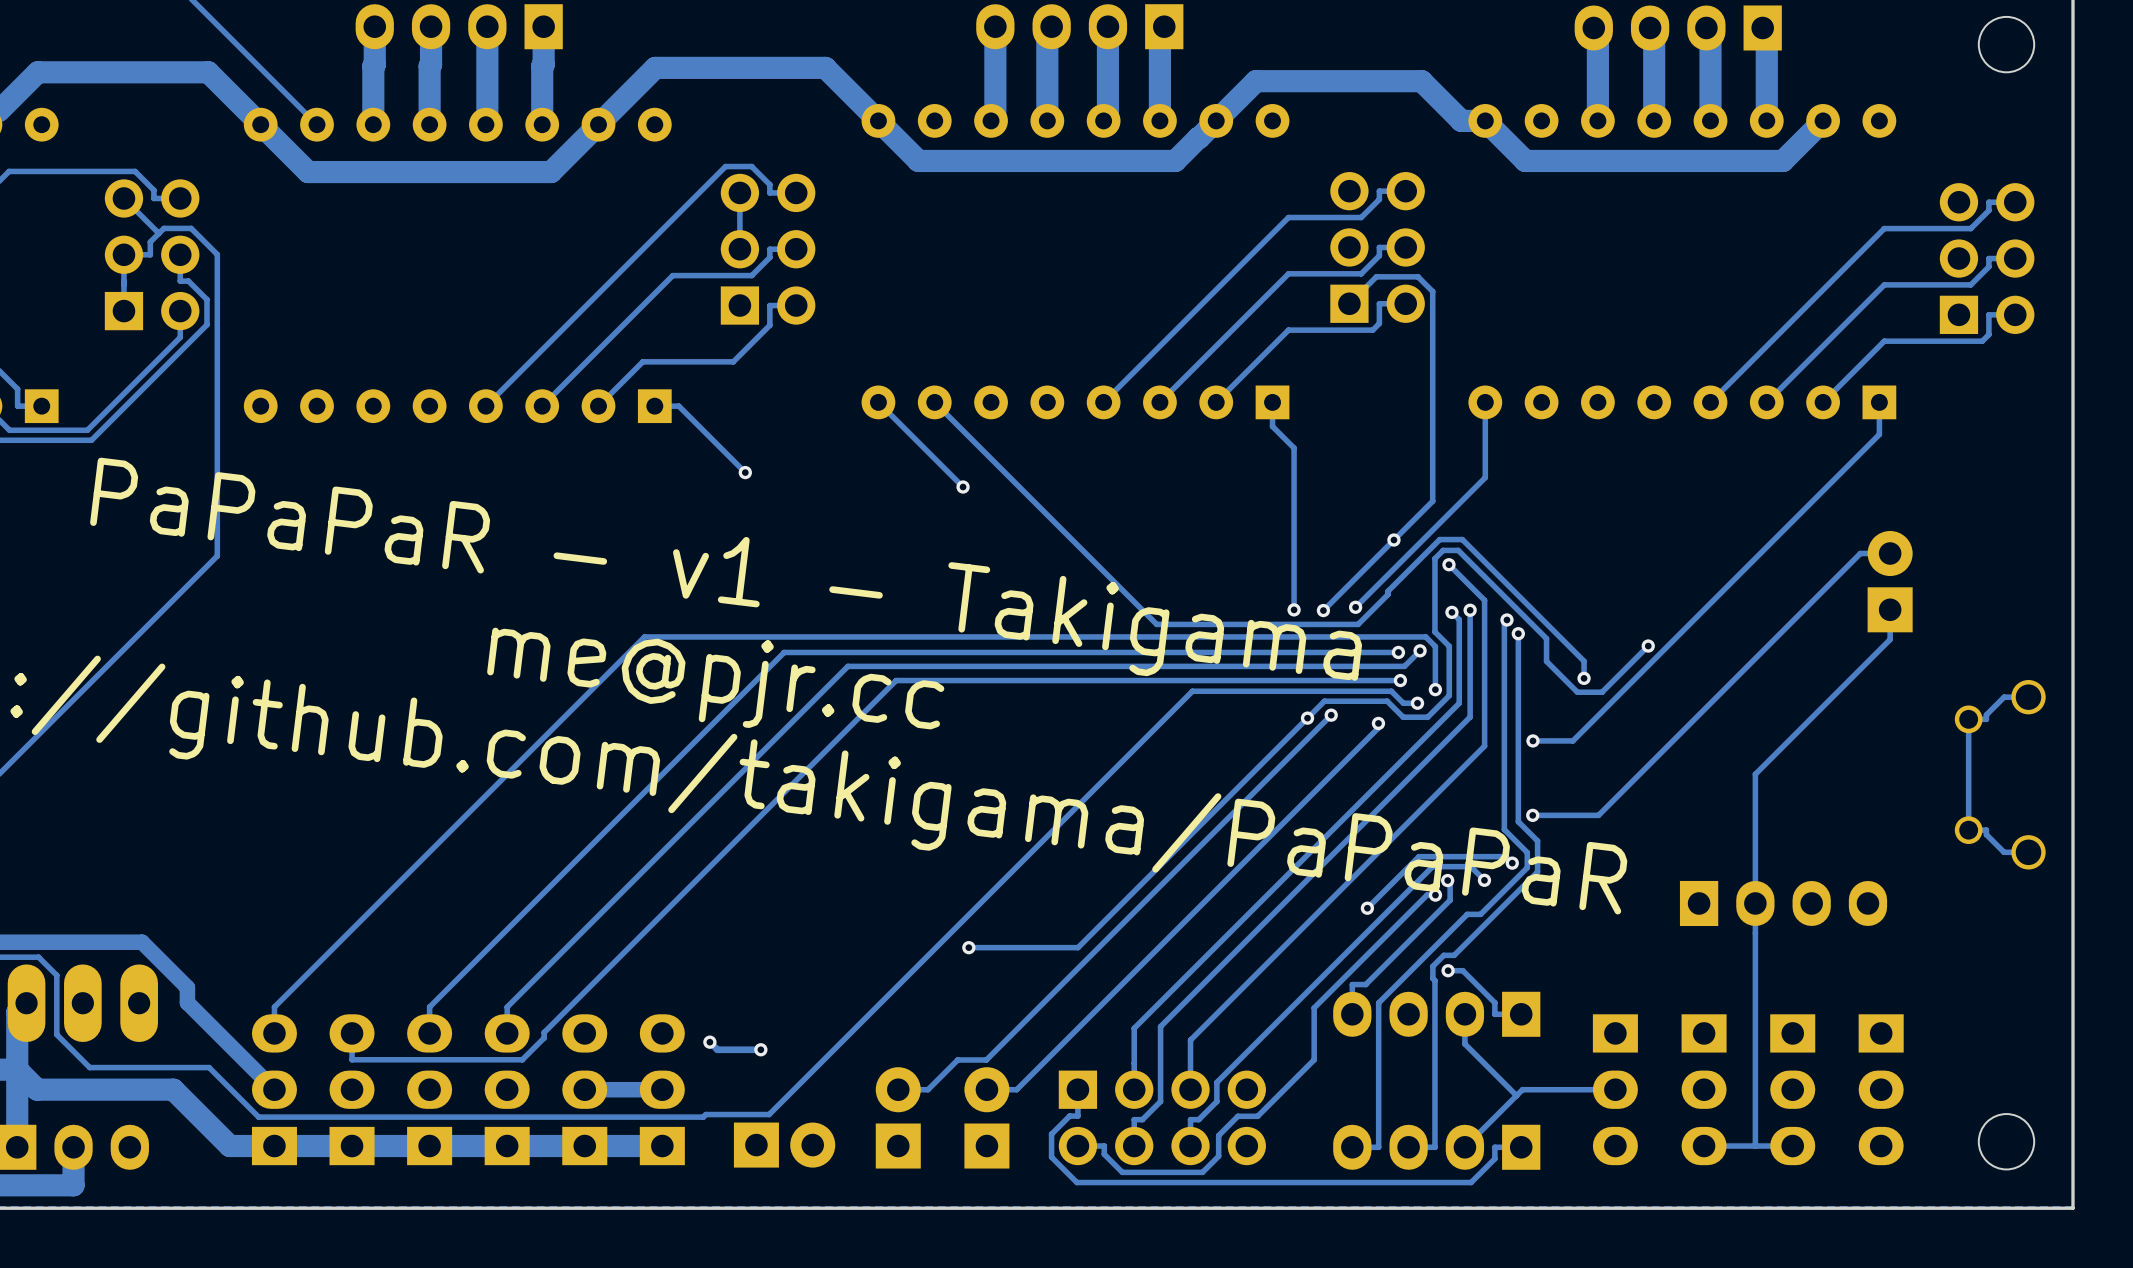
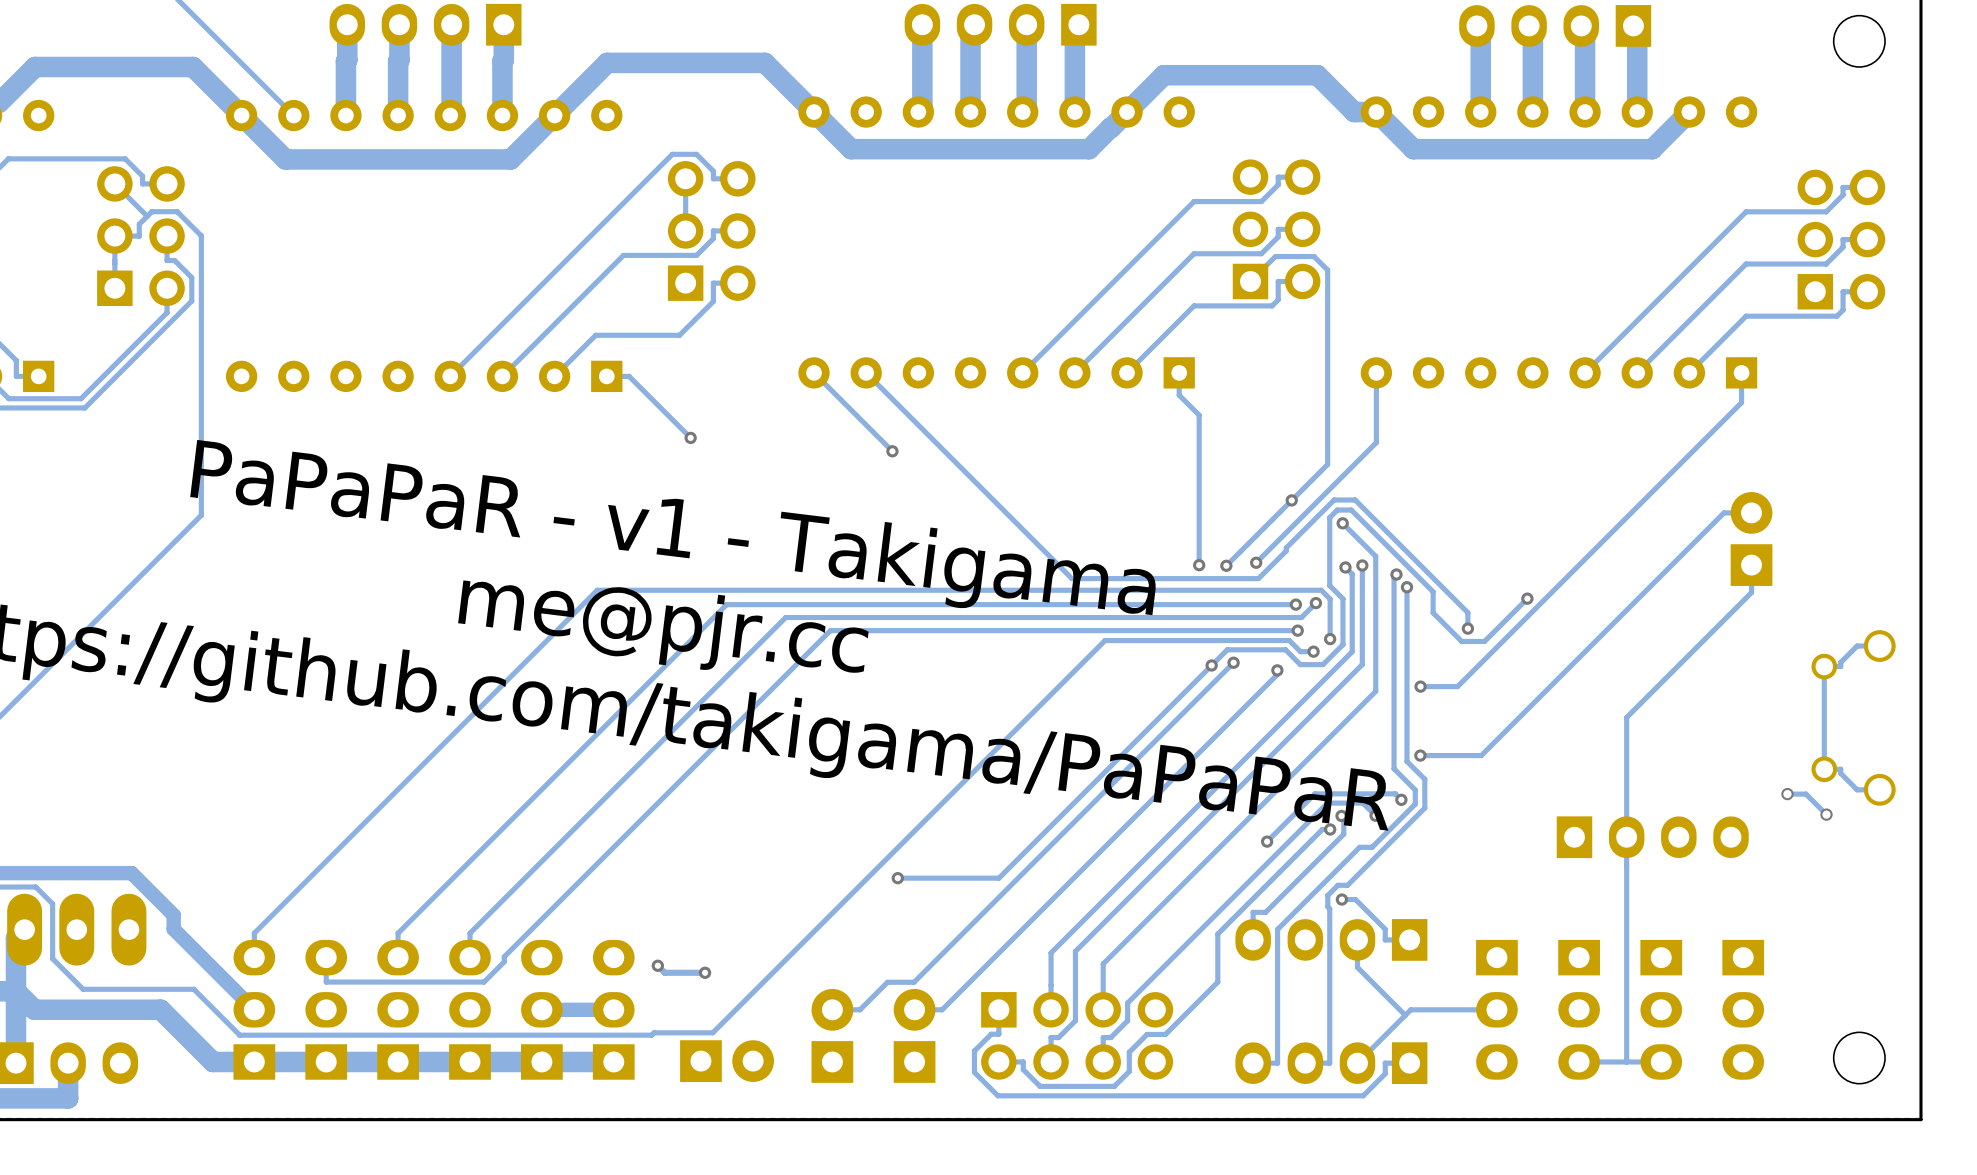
track: none -> (1787, 794) (1805, 794) (1826, 814)
via: none -> (1787, 794)
via: none -> (1826, 814)

